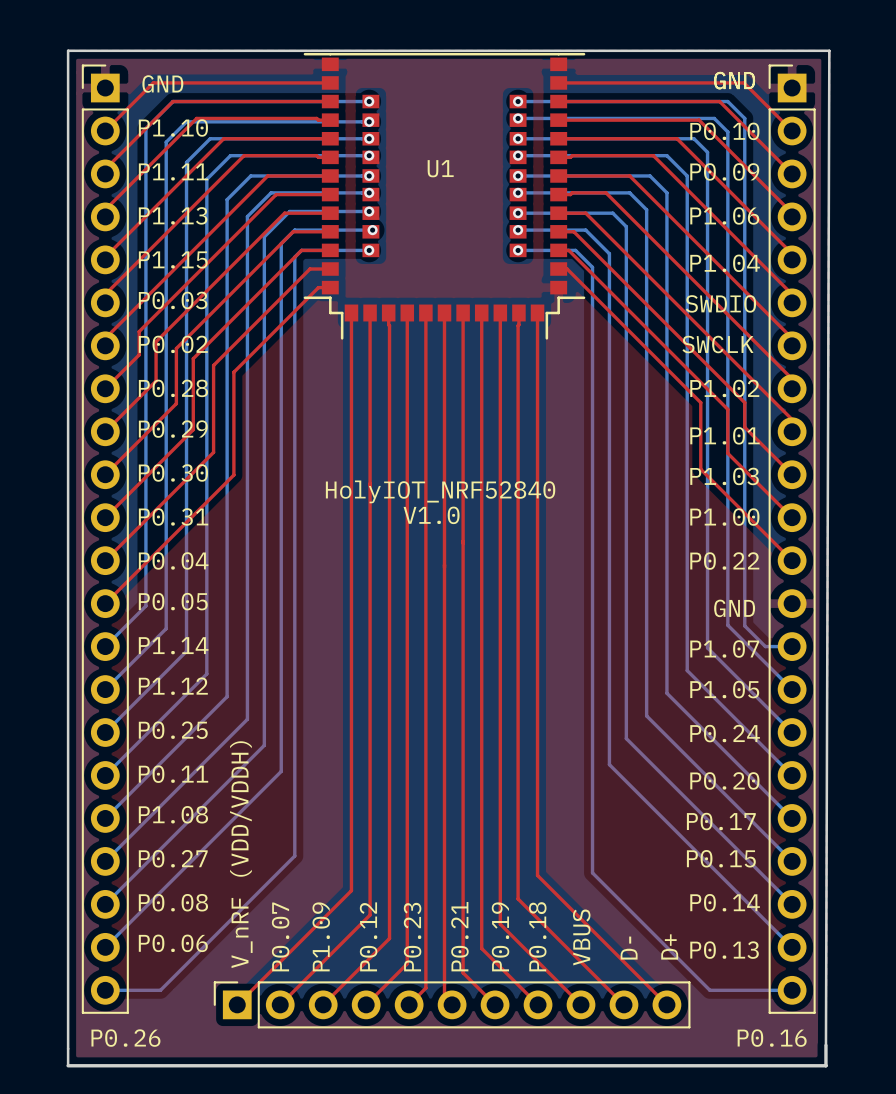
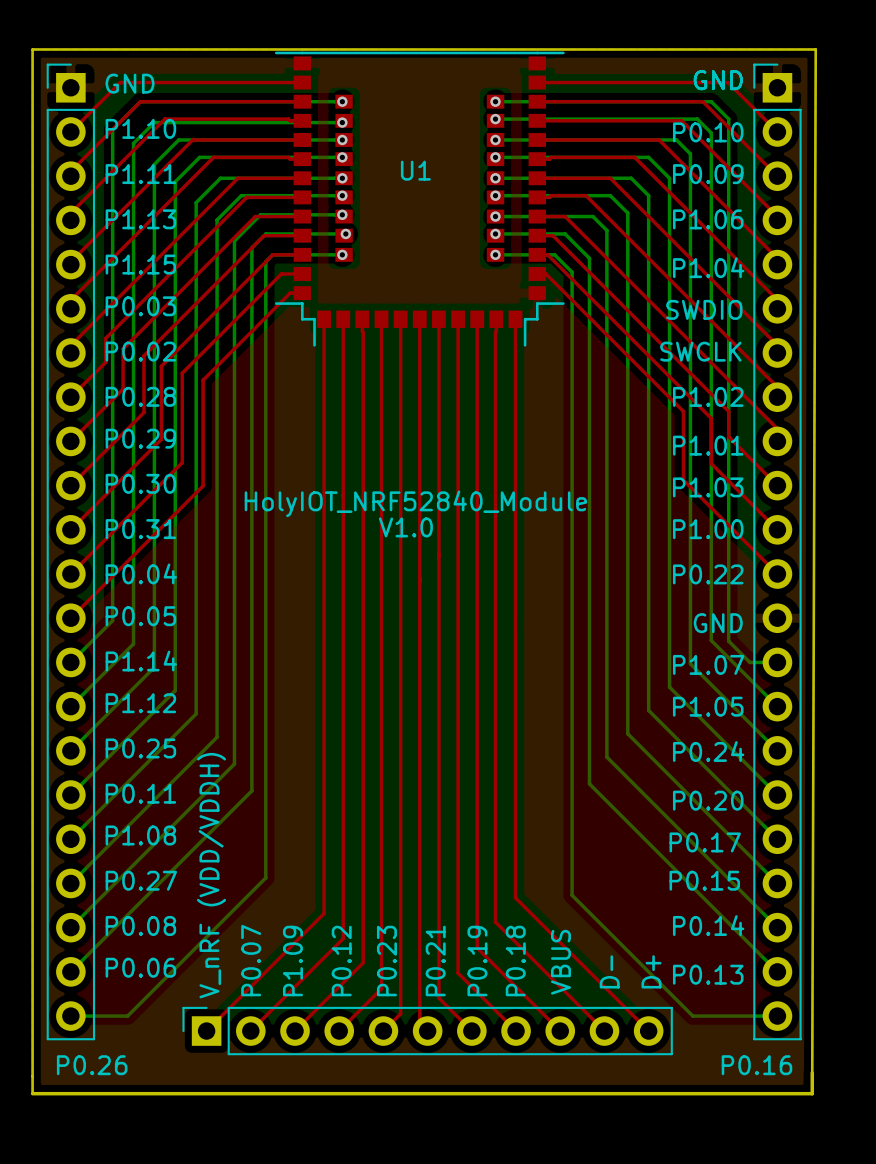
U1 value: HolyIOT_NRF52840 (440, 491) -> HolyIOT_NRF52840_Module (415, 503)

